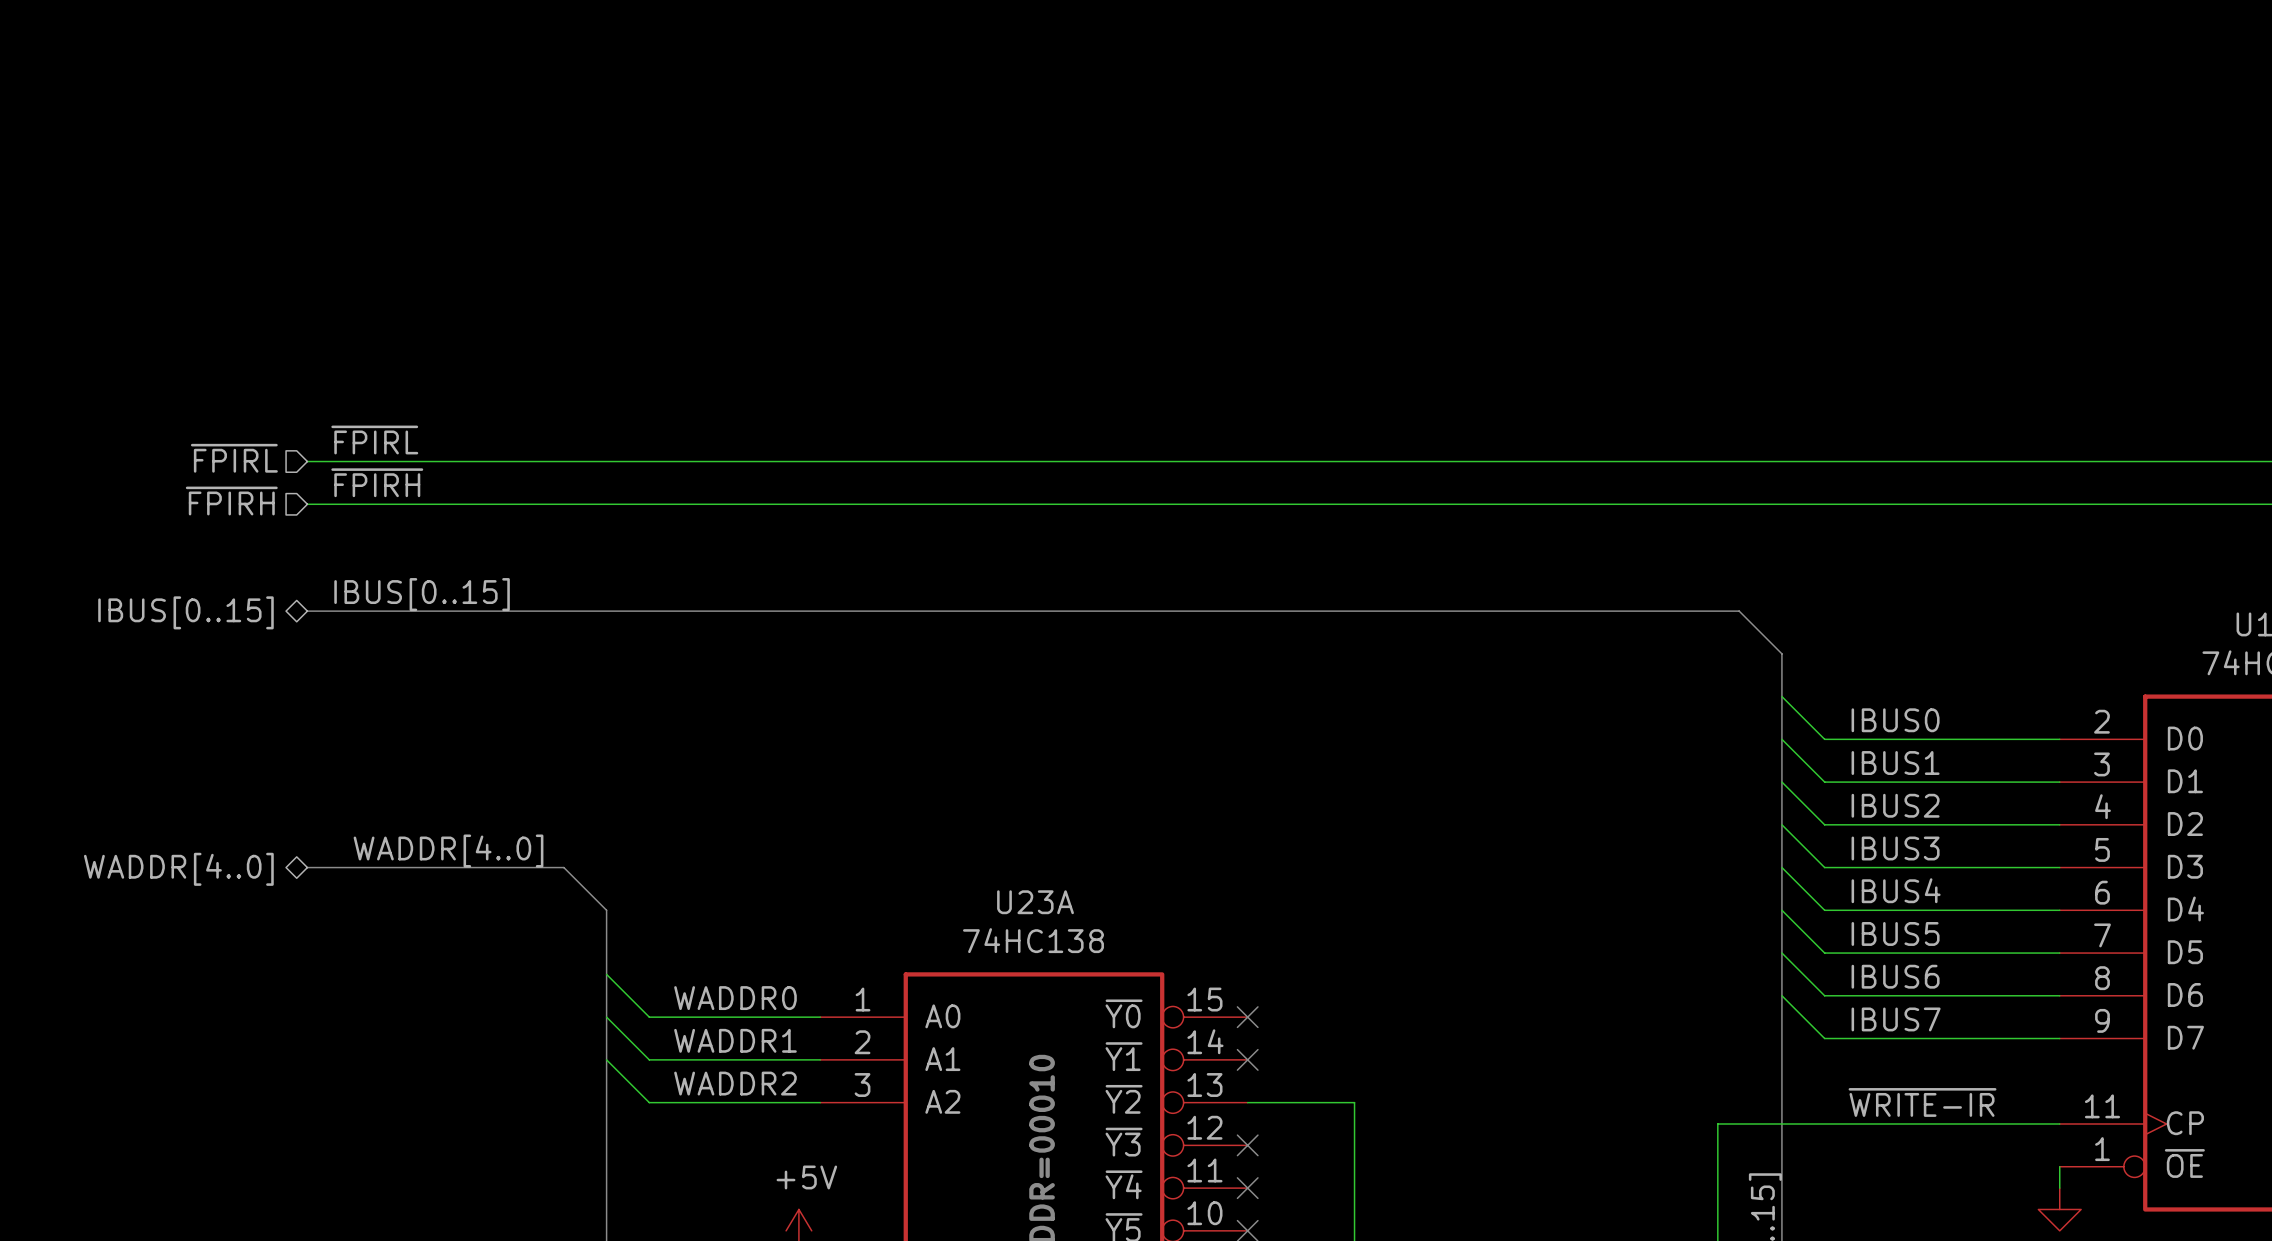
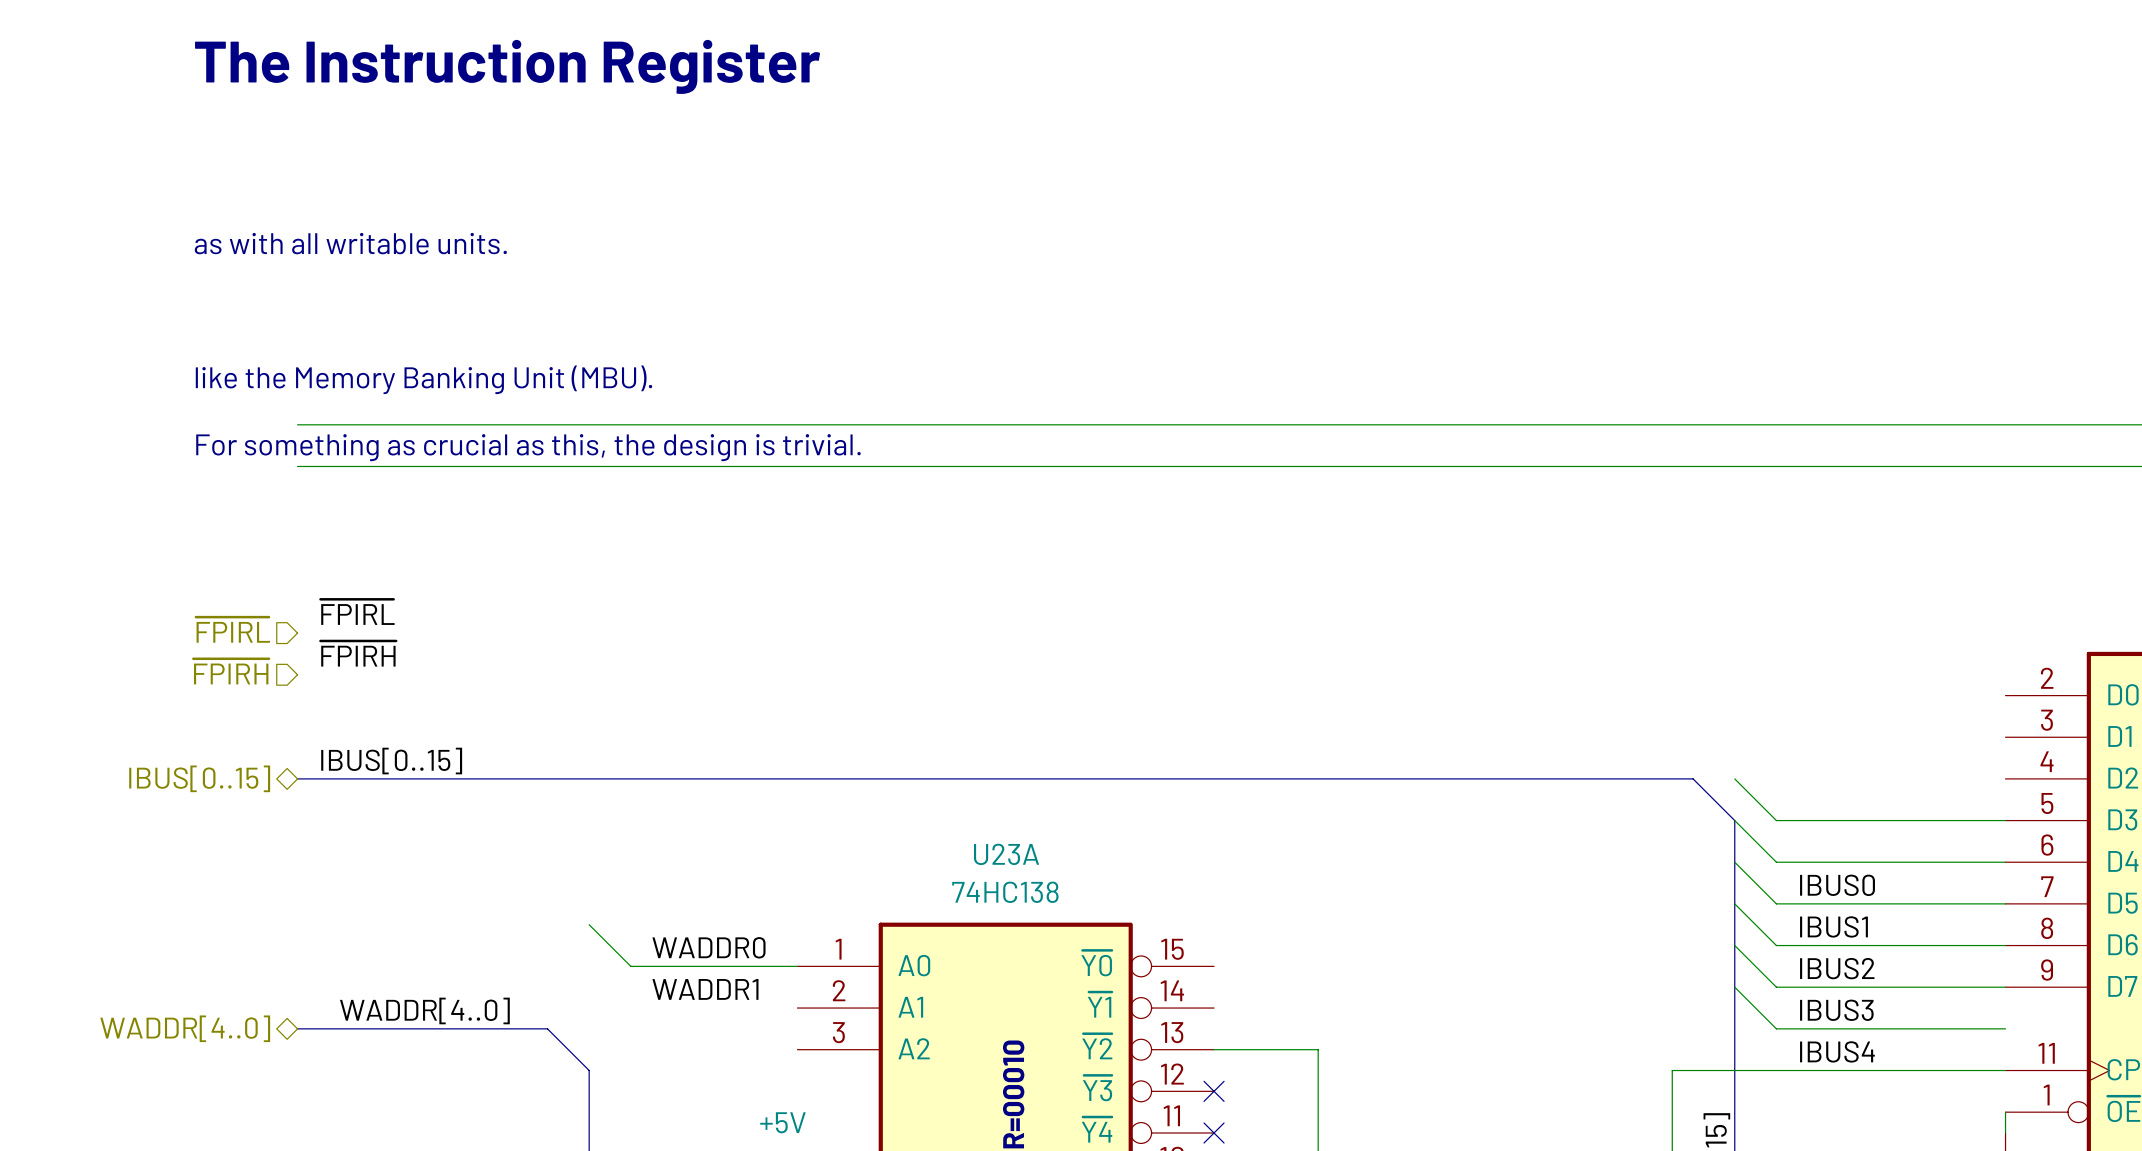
text: none -> The Instruction Register (507, 66)
text: none -> as with all writable units. (350, 243)
text: none -> like the Memory Banking Unit (MBU). (424, 379)
label position: ~{FPIRL} (374, 440) -> ~{FPIRL} (357, 612)
hierarchical label position: ~{FPIRL} (234, 458) -> ~{FPIRL} (232, 629)
label position: ~{FPIRH} (377, 482) -> ~{FPIRH} (358, 653)
text: none -> For something as crucial as this, the design is trivial. (528, 447)
hierarchical label position: ~{FPIRH} (231, 501) -> ~{FPIRH} (231, 671)
label position: IBUS[0..15] (422, 594) -> IBUS[0..15] (391, 761)
bus: (307, 611) (1739, 611) (1781, 653) (1781, 867) -> (297, 778) (1693, 778) (1734, 820)
hierarchical label position: IBUS[0..15] (185, 612) -> IBUS[0..15] (199, 778)
wire: (1781, 696) (1824, 739) (2059, 739) -> (1734, 987) (1776, 1028) (2005, 1028)
label: IBUS0 (1895, 720) -> none
wire: (1781, 739) (1824, 782) (2059, 782) -> none
label: IBUS1 (1895, 763) -> none
wire: (1781, 782) (1824, 824) (2059, 824) -> none
label: IBUS2 (1895, 805) -> none
label position: IBUS3 (1895, 848) -> IBUS3 (1836, 1010)
label position: WADDR[4..0] (448, 851) -> WADDR[4..0] (424, 1010)
bus: (307, 867) (563, 867) (606, 910) (606, 1124) -> (297, 1028) (547, 1028) (589, 1070)
hierarchical label position: WADDR[4..0] (178, 869) -> WADDR[4..0] (185, 1028)
label: IBUS4 (1896, 890) -> none
label: IBUS5 (1895, 933) -> IBUS0 (1837, 885)
label: IBUS6 (1895, 976) -> IBUS1 (1833, 926)
wire: (606, 1017) (649, 1059) (820, 1059) -> none
no-connect mark: (1247, 1017) -> none
label: IBUS7 (1896, 1019) -> IBUS2 (1837, 968)
wire: (606, 1059) (649, 1102) (820, 1102) -> none
no-connect mark: (1247, 1059) -> none
label: WADDR2 (735, 1083) -> none
label: ~{WRITE-IR} (1922, 1102) -> IBUS4 (1837, 1051)

